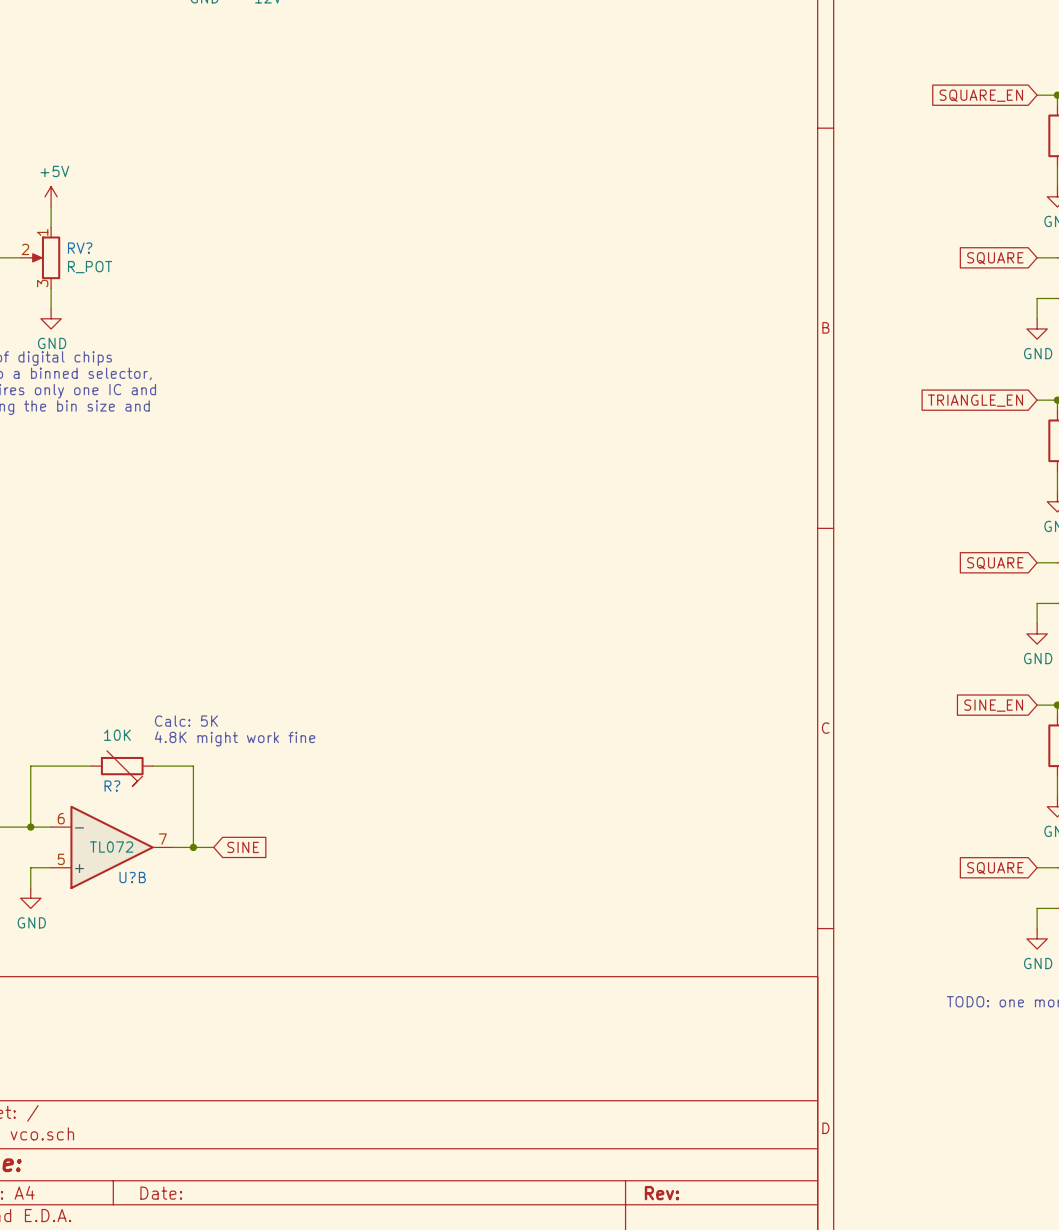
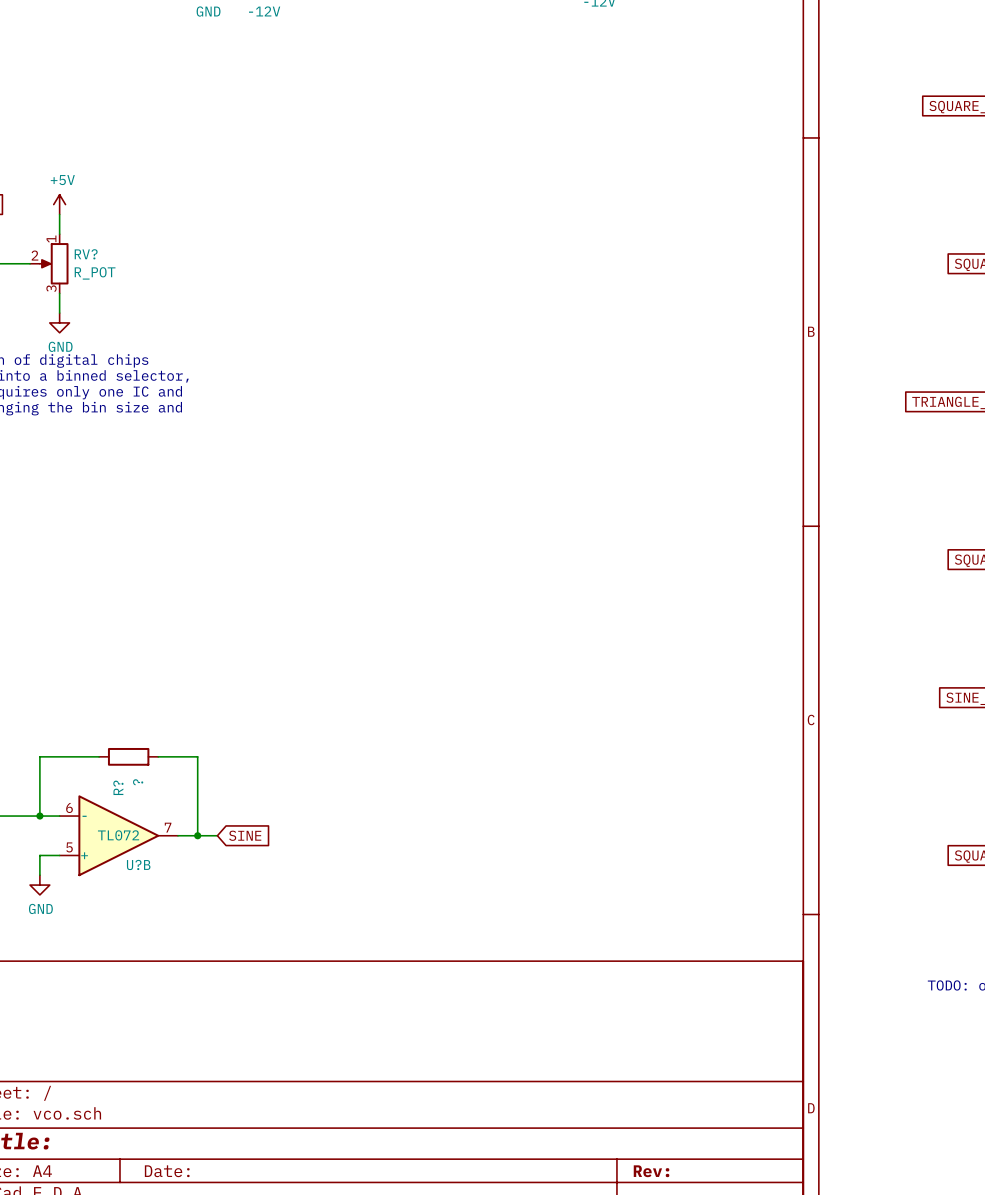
text: Calc: 5K (186, 721) -> none
R? value: 10K (117, 735) -> ? (138, 782)
text: 4.8K might work fine (235, 738) -> none
R? symbol: [91, 750, 153, 787] -> [99, 747, 159, 766]

